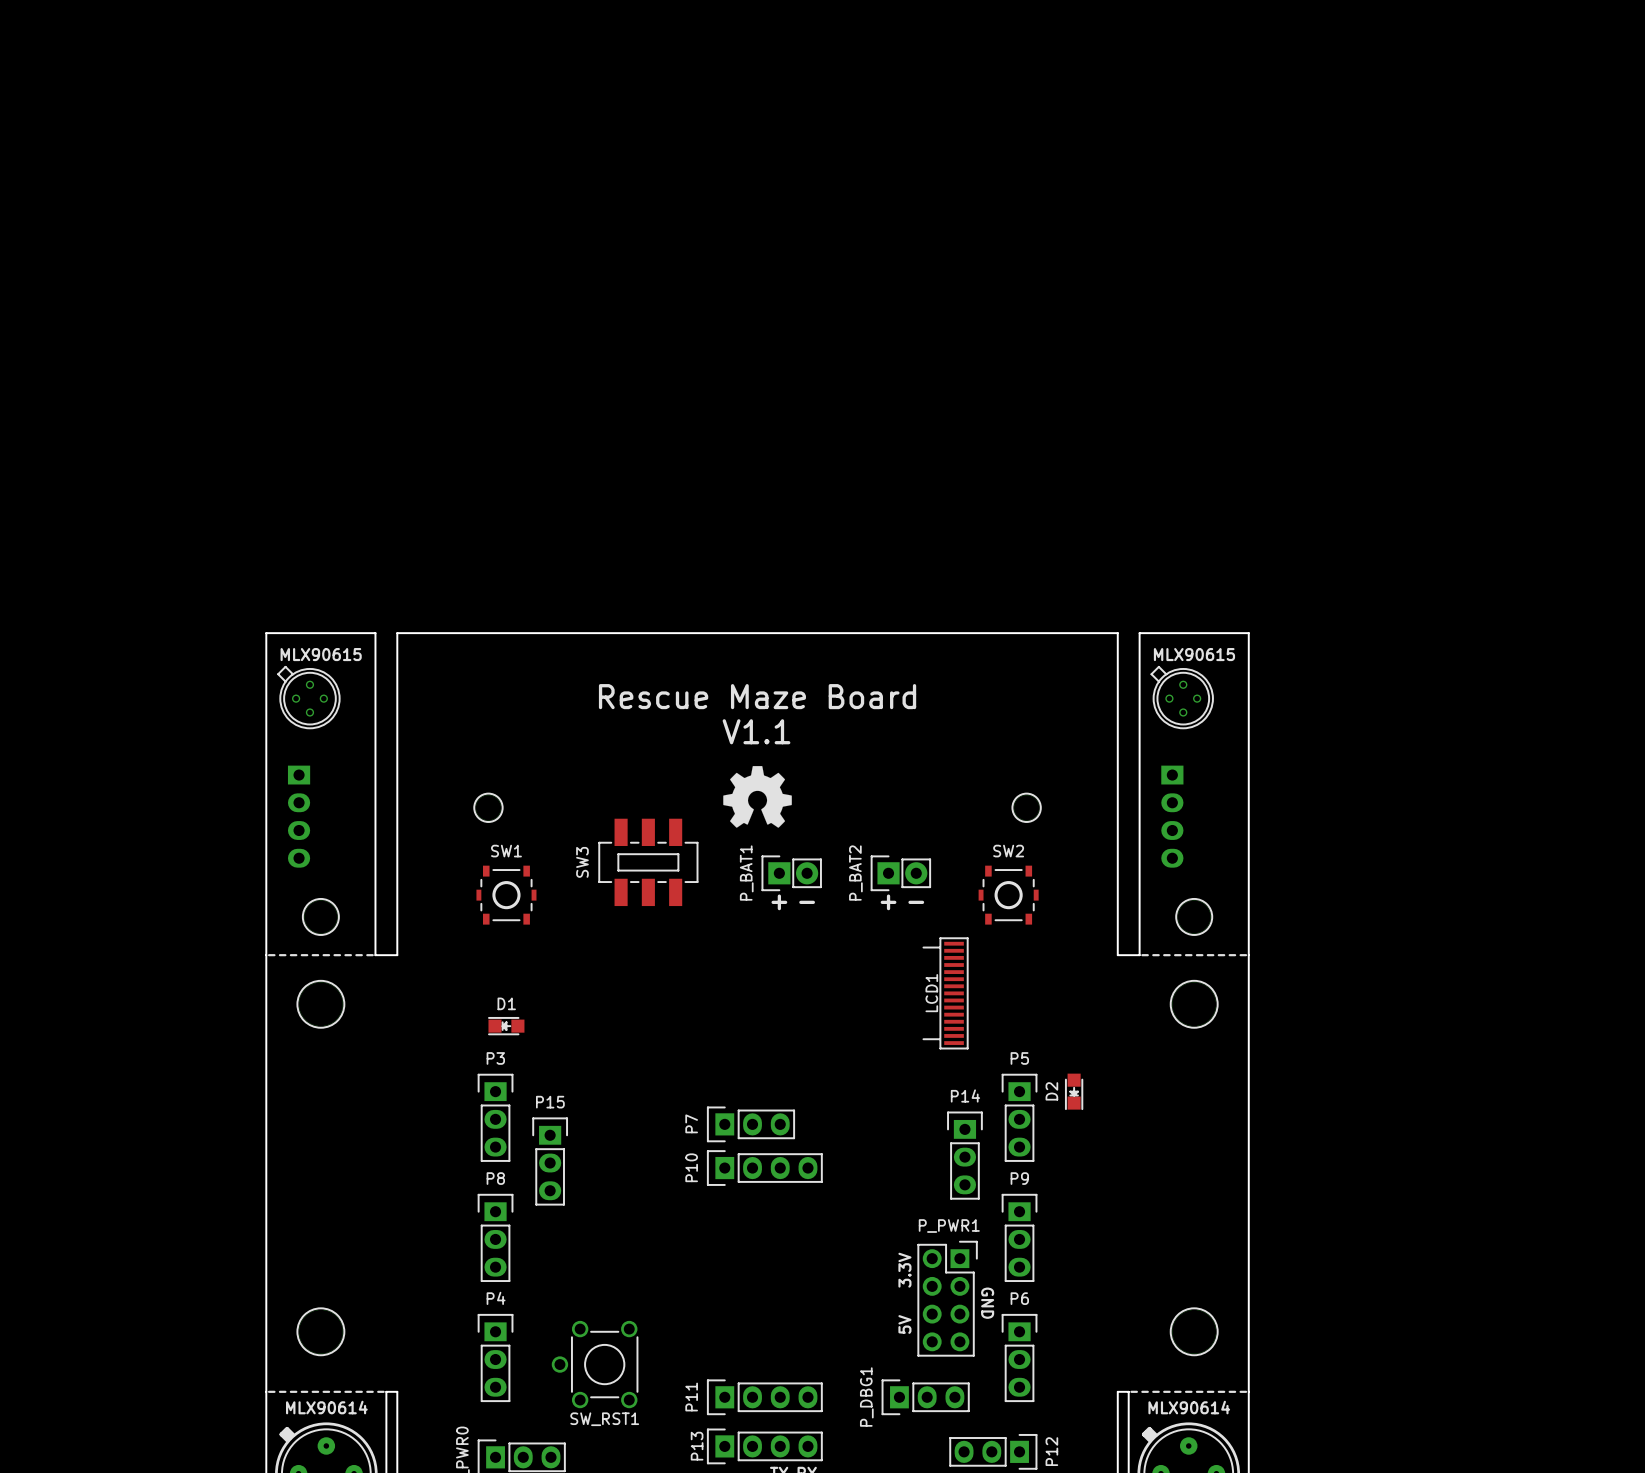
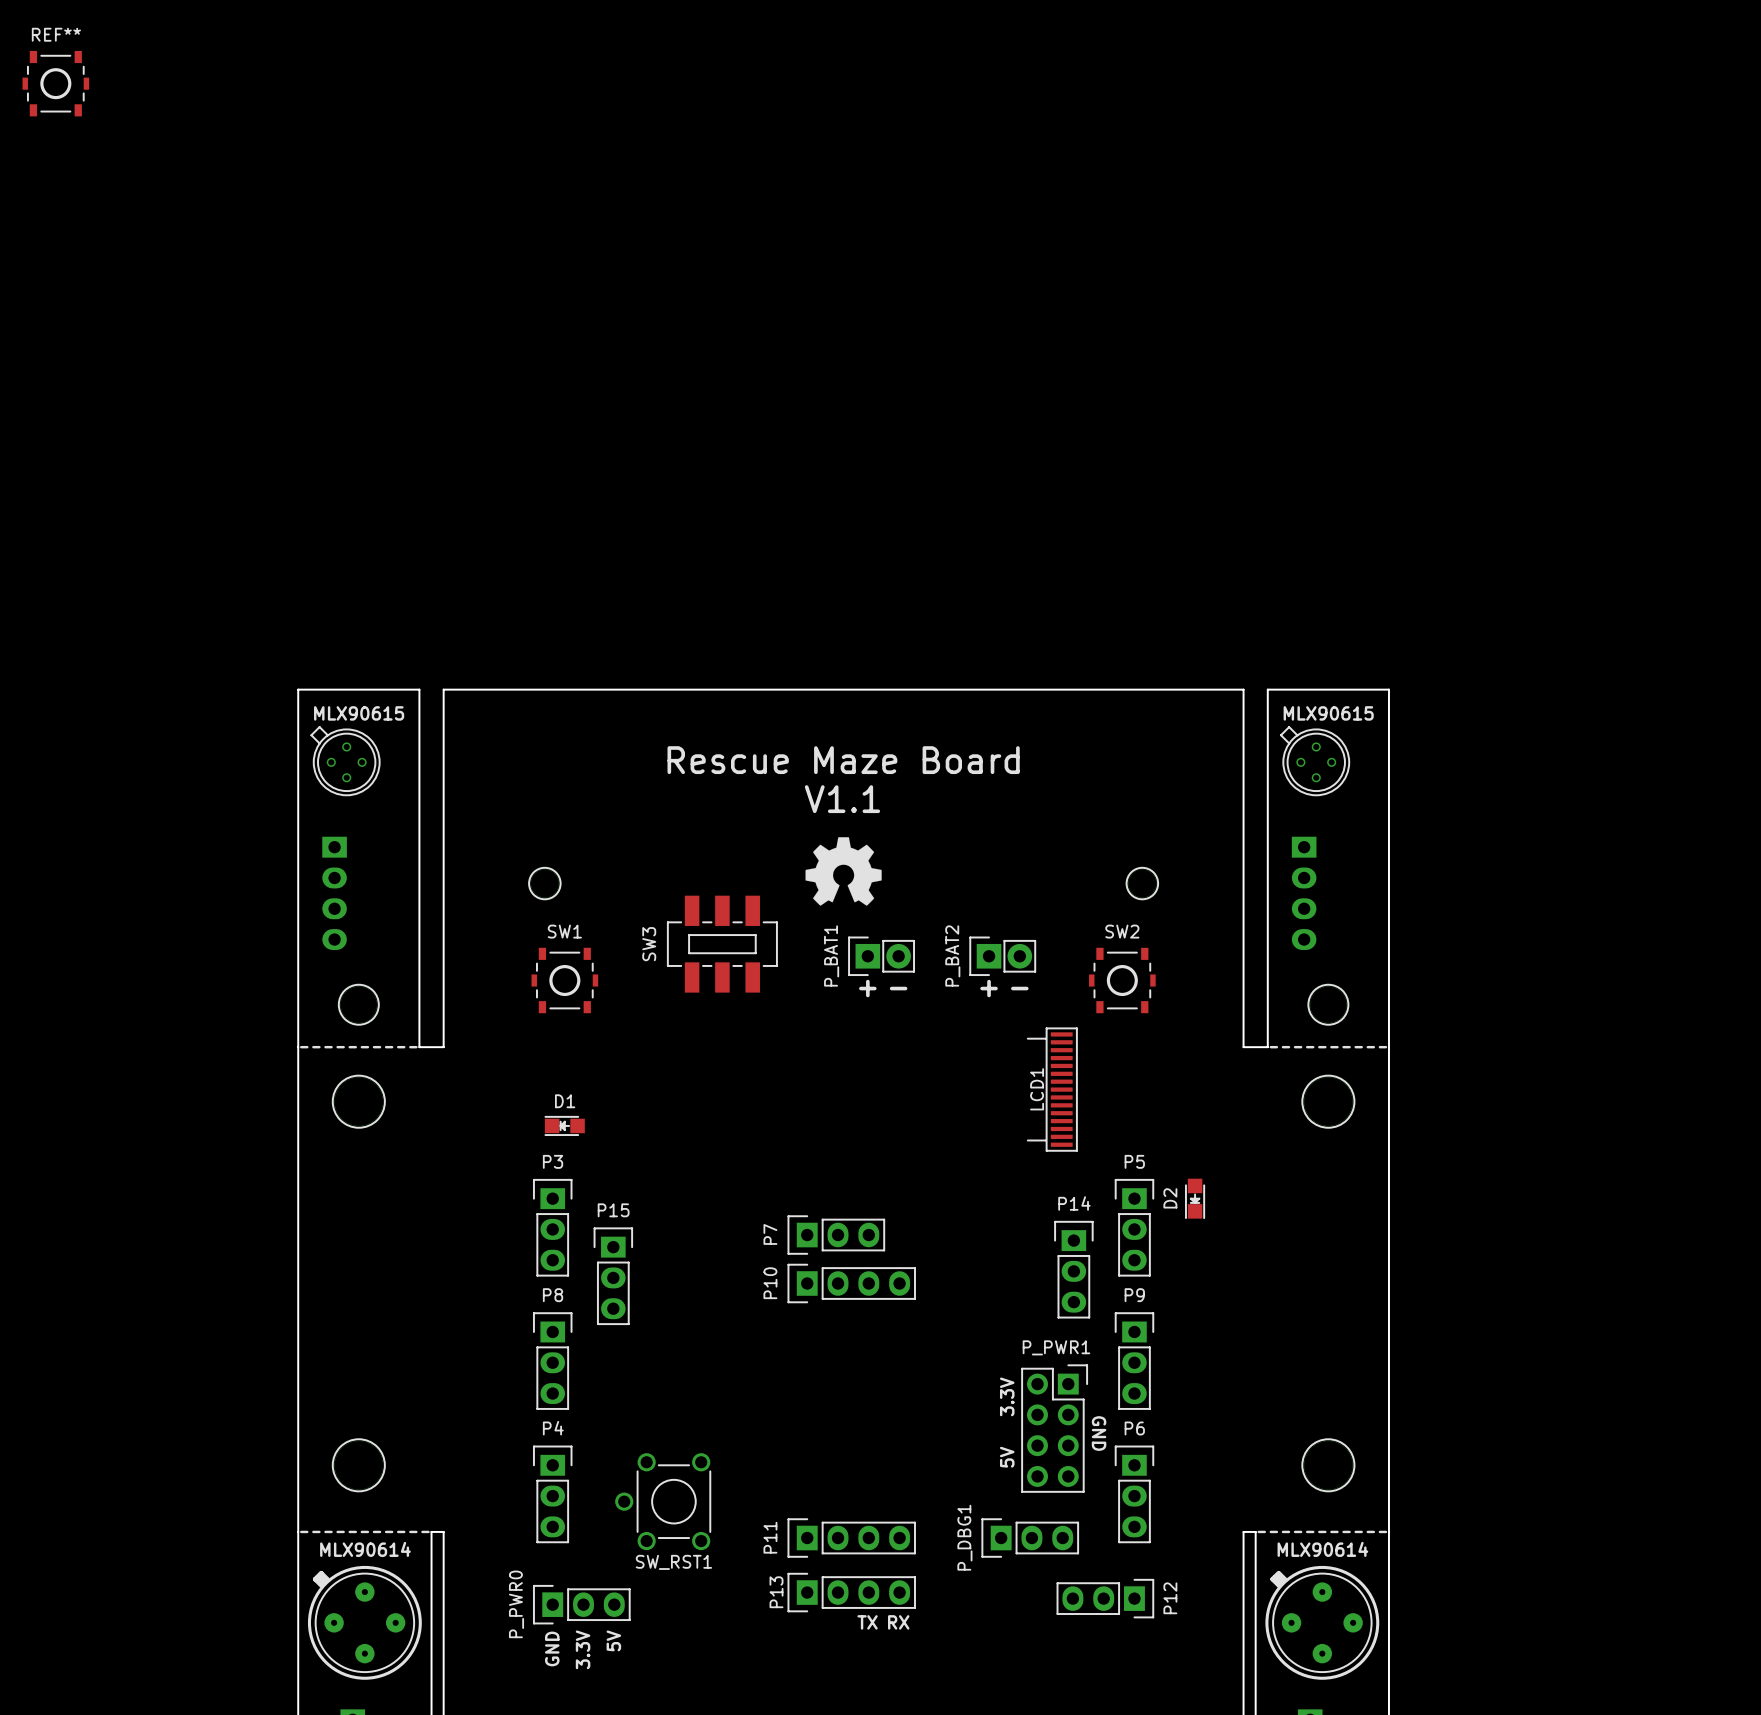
REF**: none -> (55, 83)

